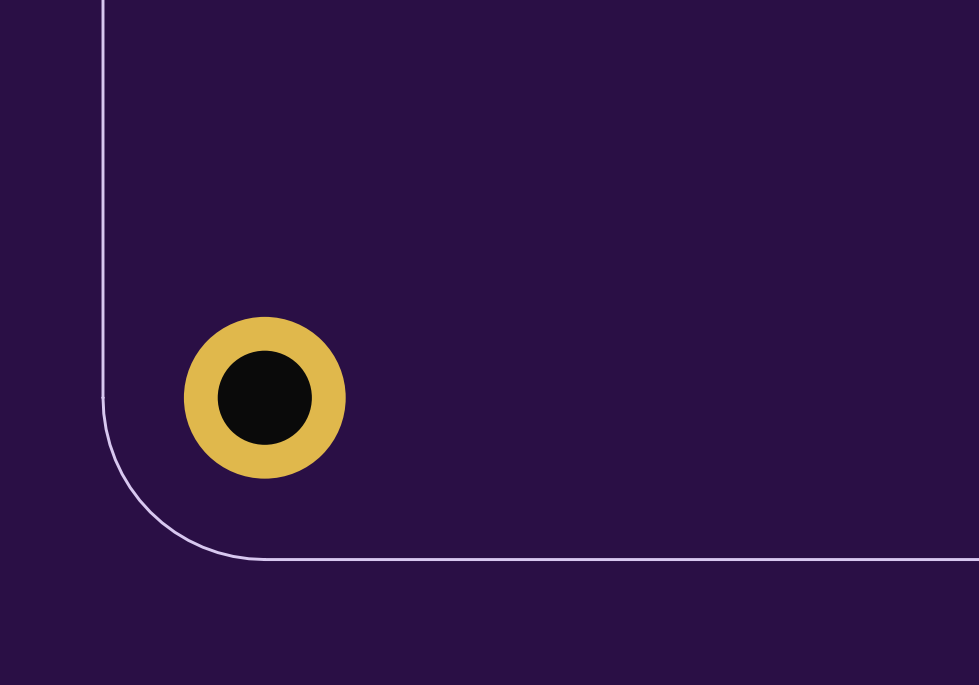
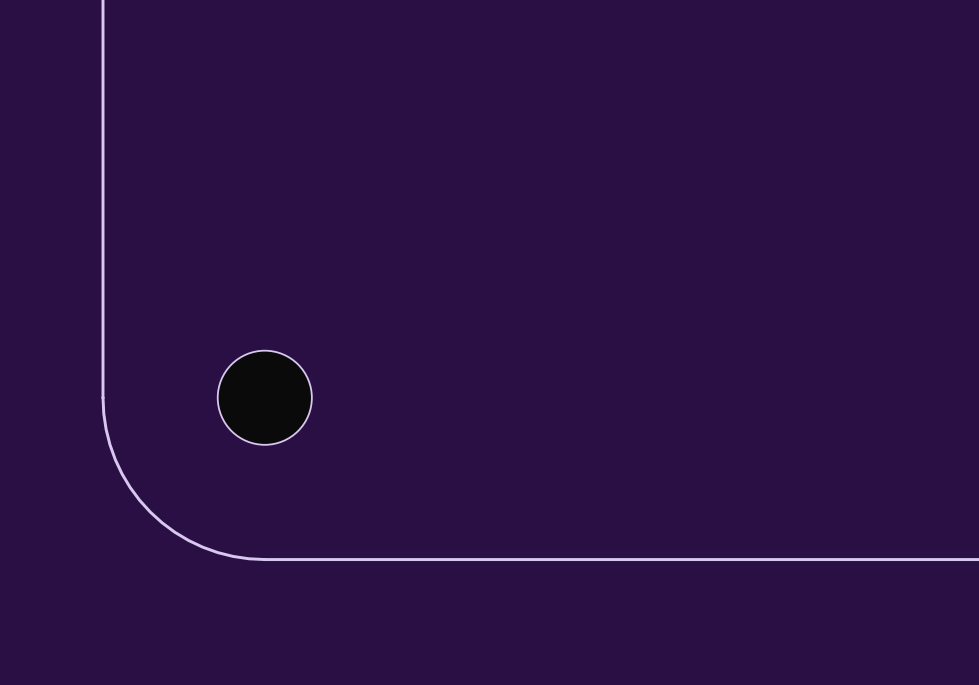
part footprint: [183, 316, 346, 479] -> [217, 350, 312, 445]

